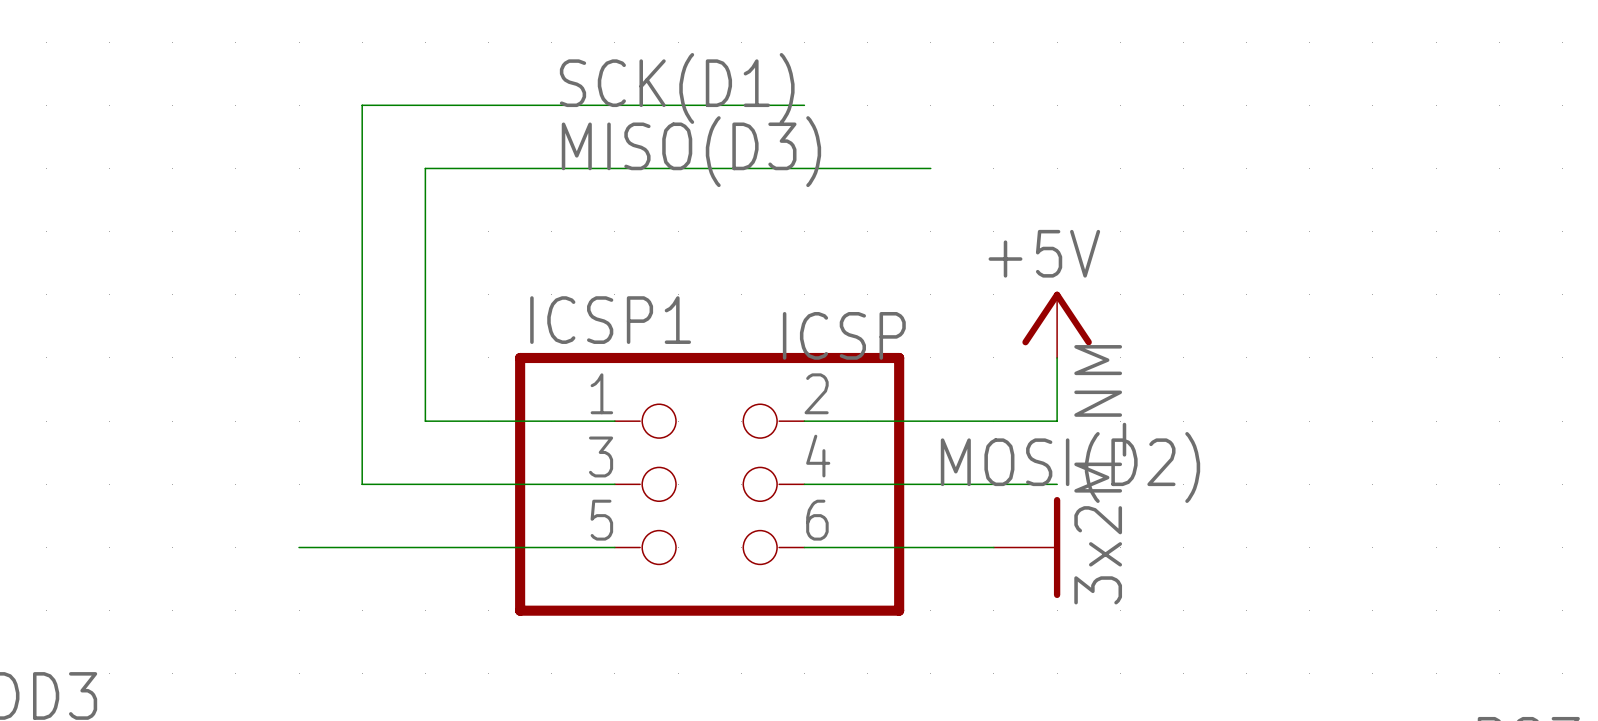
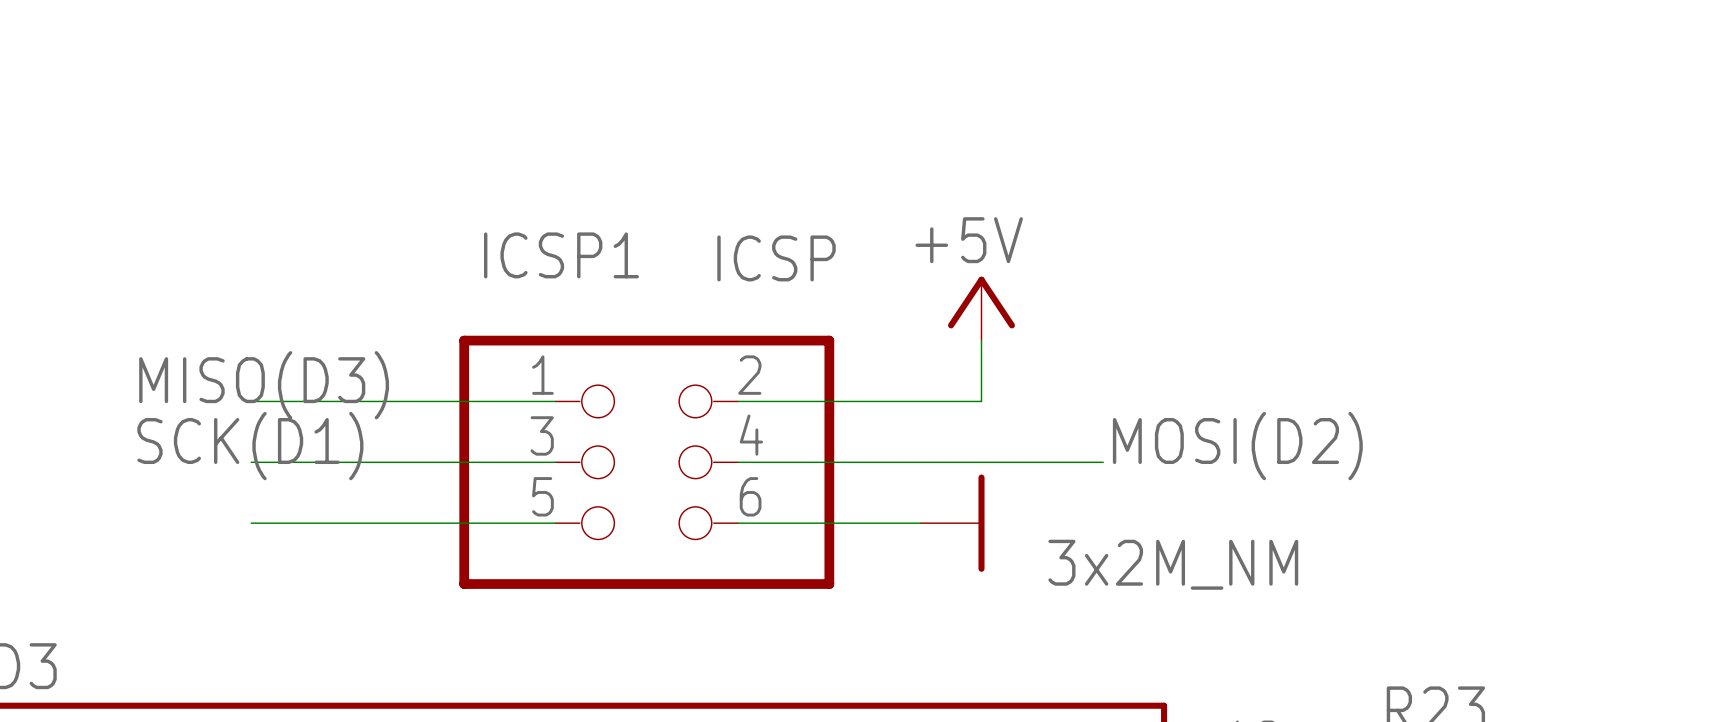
label position: SCK(D1) (677, 88) -> SCK(D1) (250, 446)
wire: (804, 105) (362, 105) (362, 484) -> (251, 462) (312, 462)
label position: MISO(D3) (691, 151) -> MISO(D3) (264, 385)
wire: (930, 168) (425, 168) (425, 421) -> (251, 401) (372, 401)
ICSP1 name position: ICSP1 (610, 320) -> ICSP1 (561, 255)
ICSP1 value position: ICSP (844, 335) -> ICSP (776, 258)
label position: MOSI(D2) (1070, 467) -> MOSI(D2) (1237, 446)
power symbol text rotation: 0° (1100, 474) -> 90° clockwise (1173, 564)
wire: none -> (981, 462) (1103, 462)

